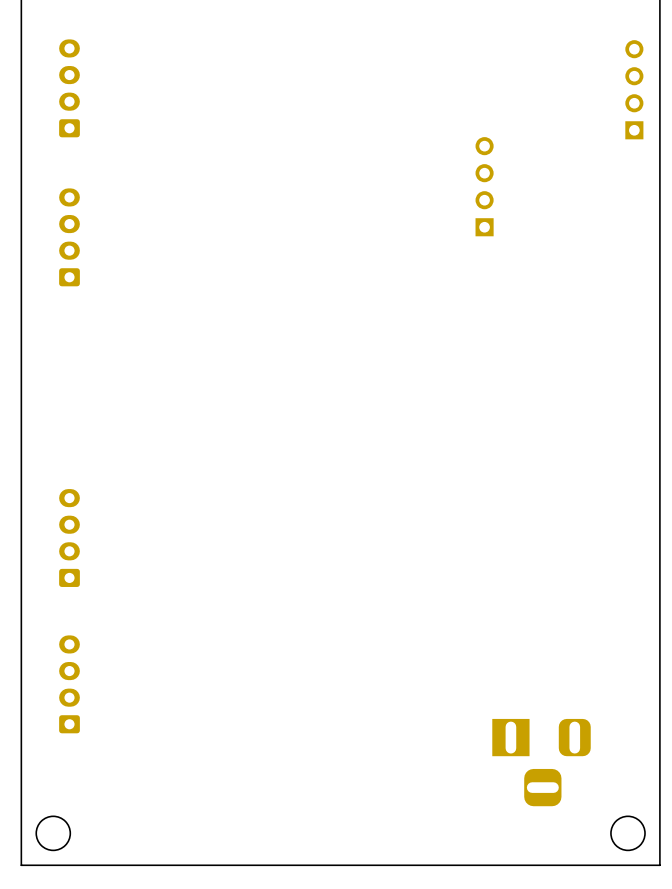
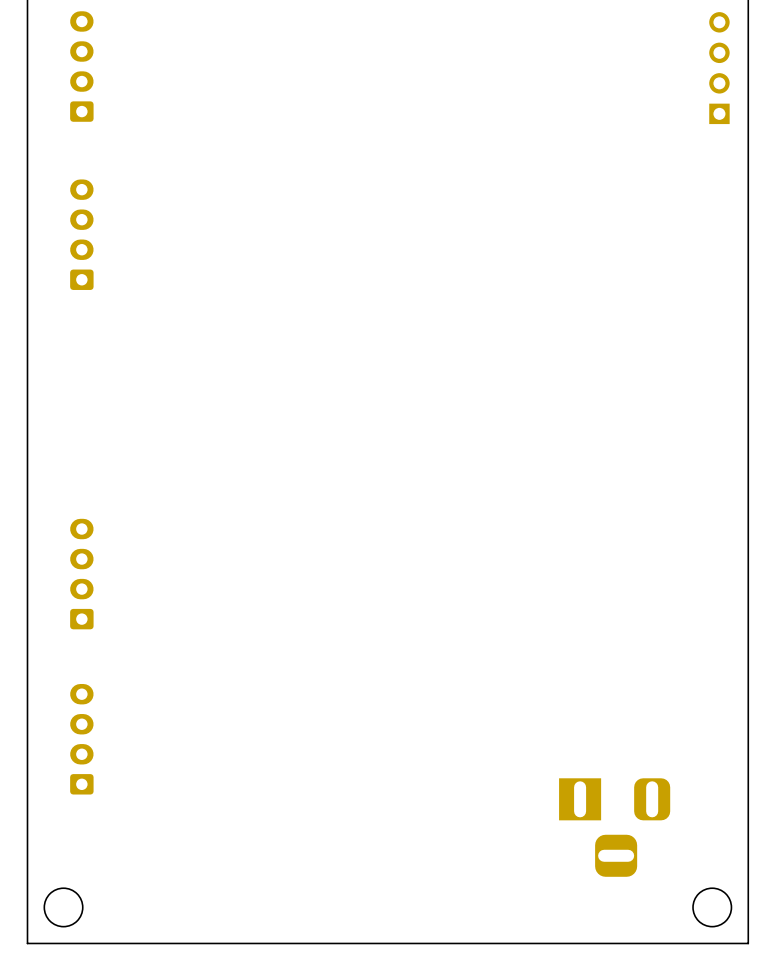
part: (484, 186) -> none

